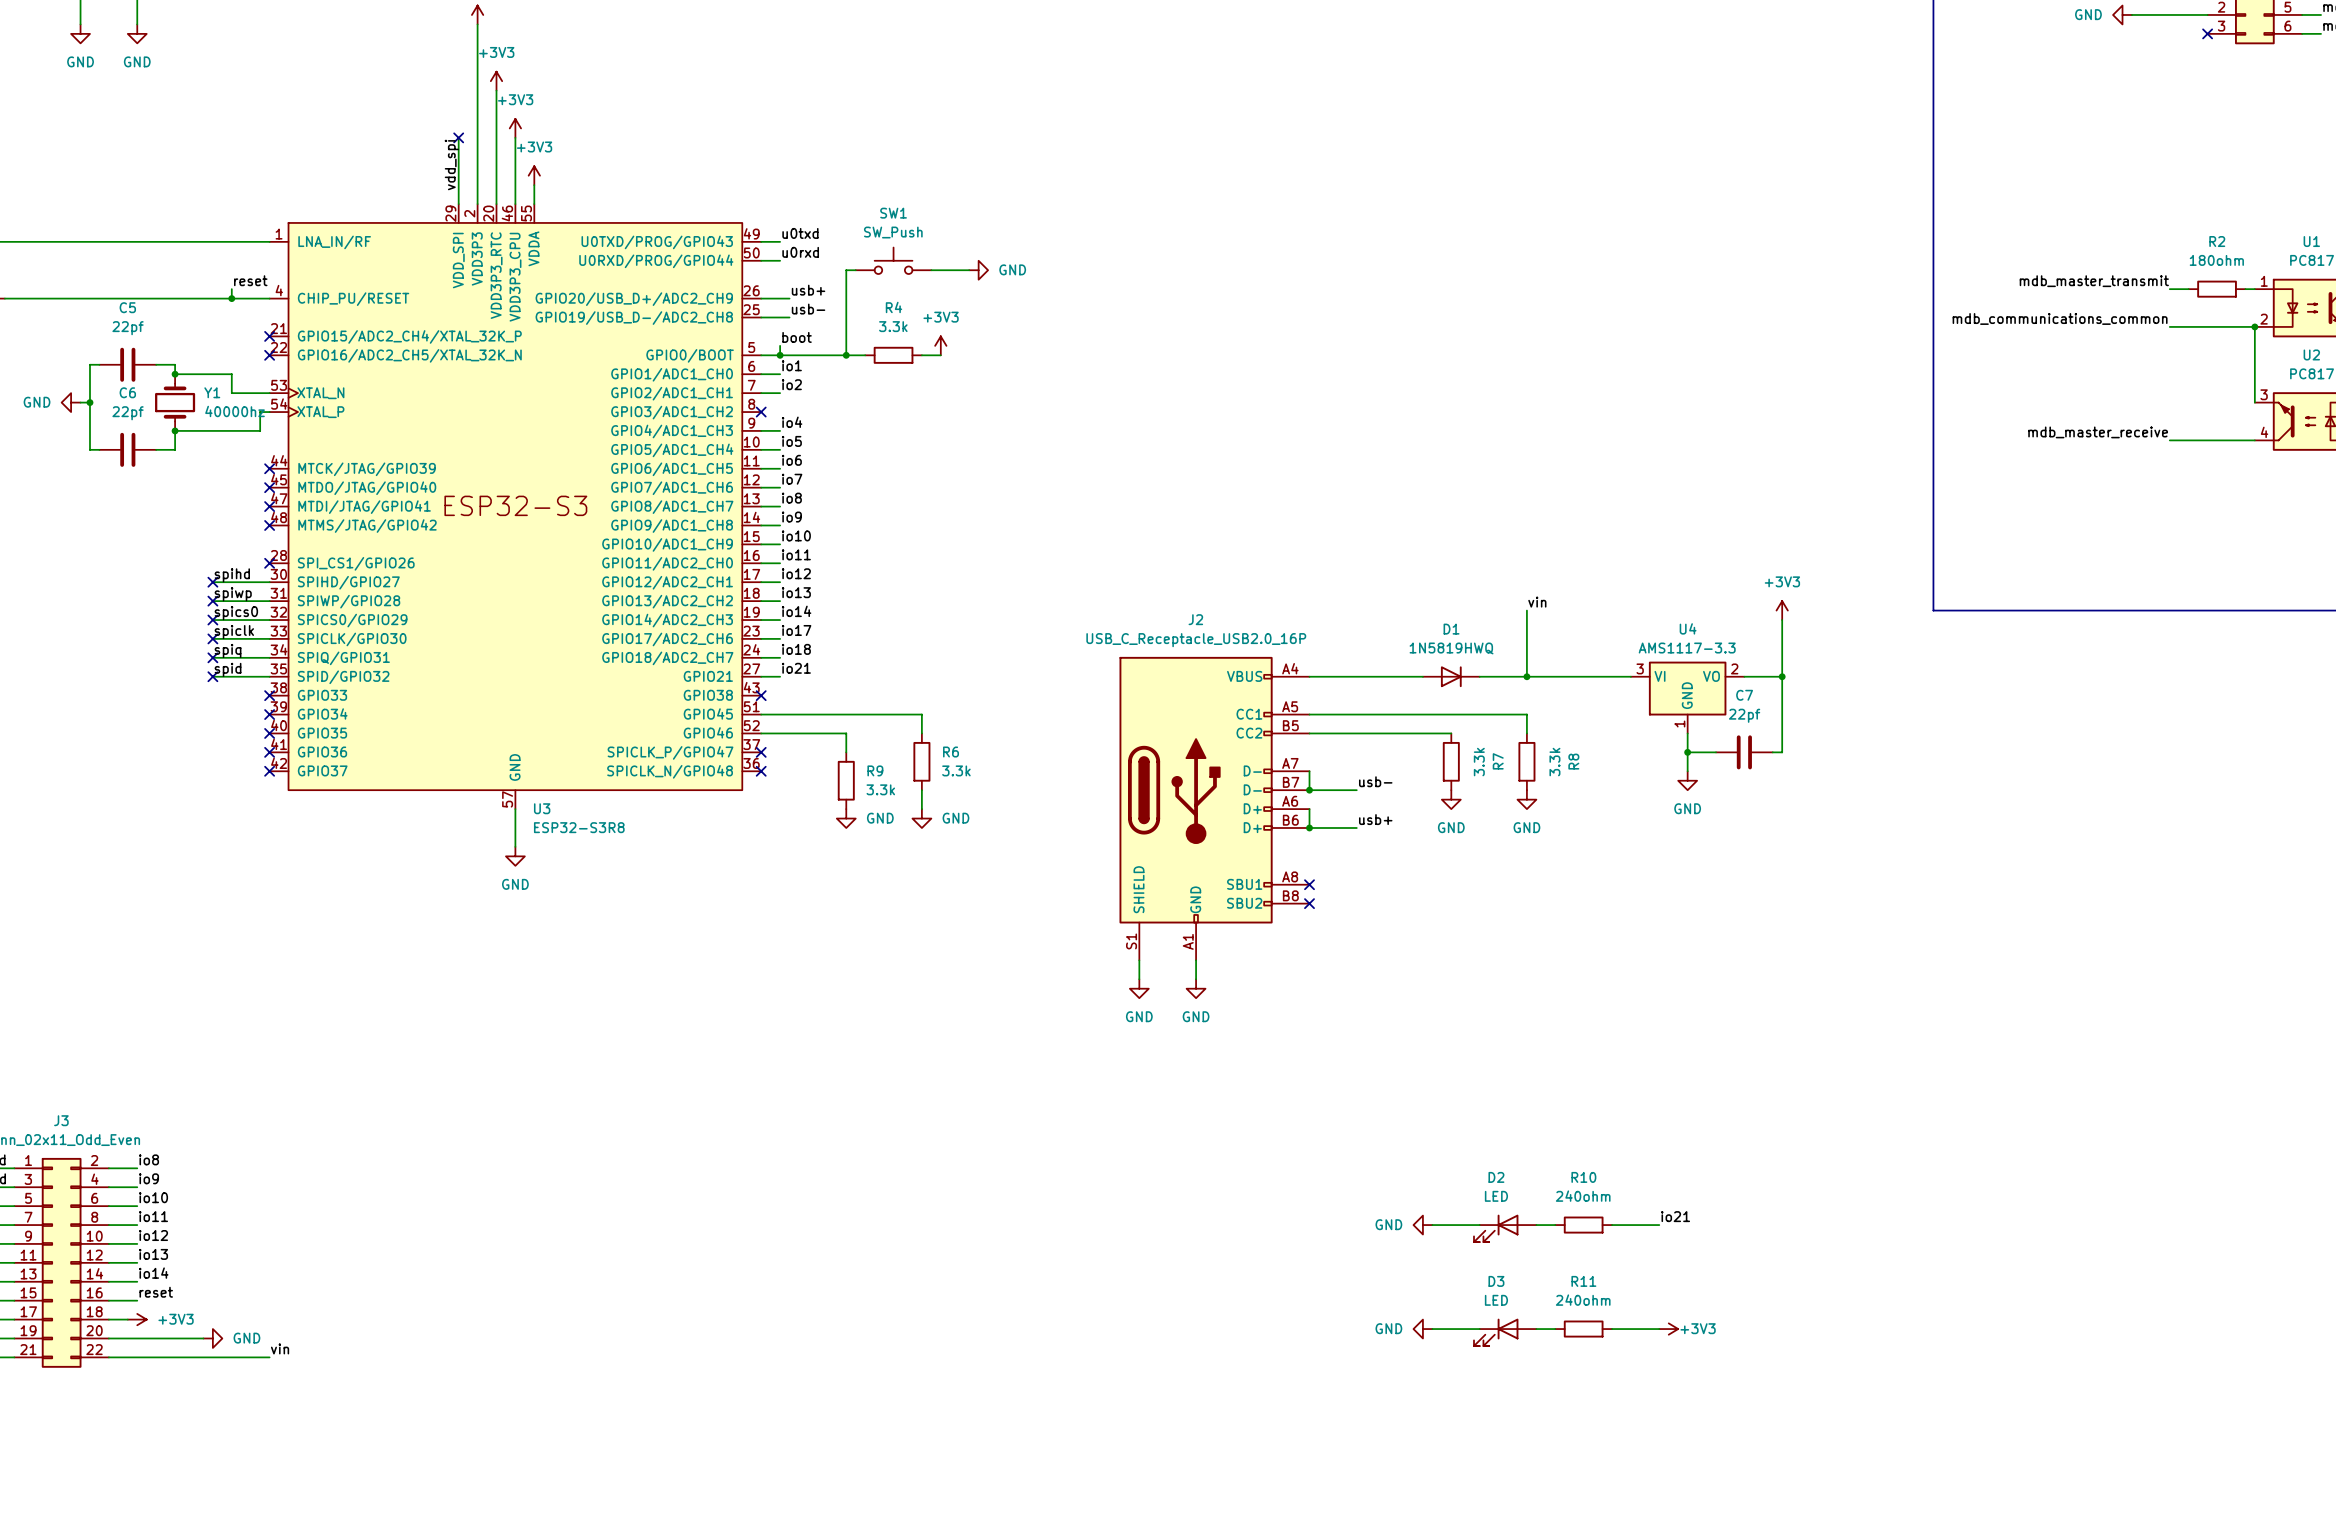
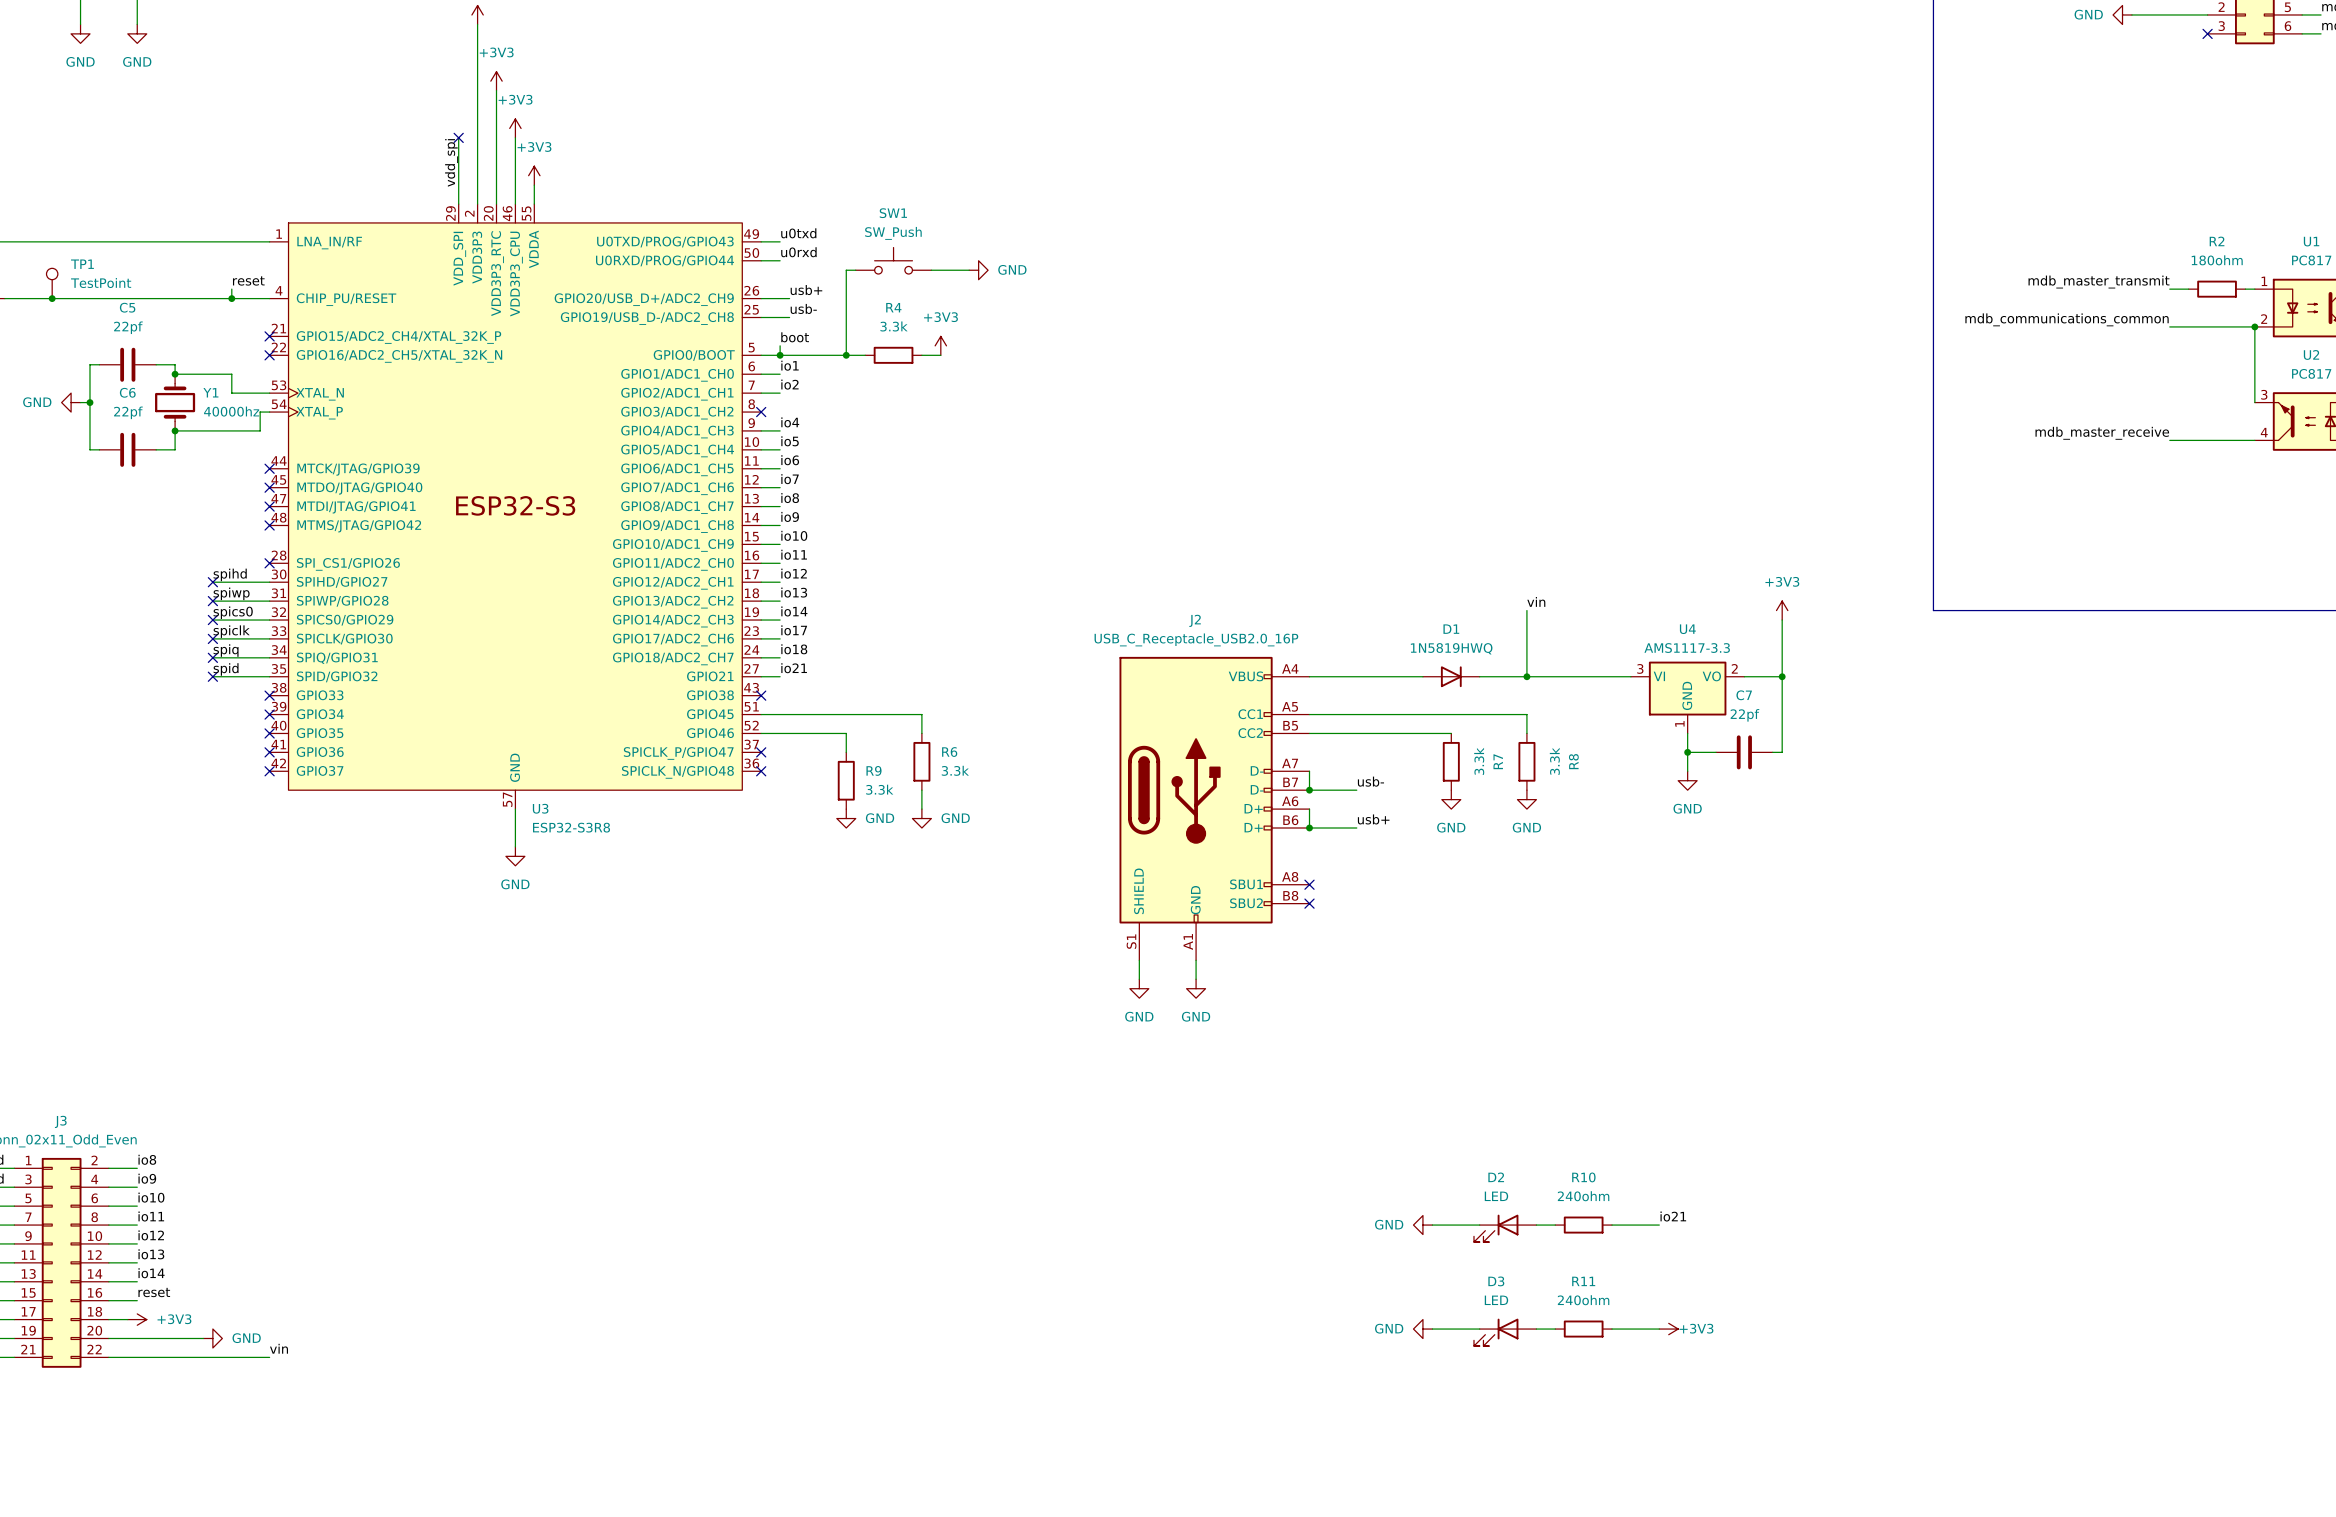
TP1: none -> TestPoint (52, 283)
junction: none -> (52, 298)

